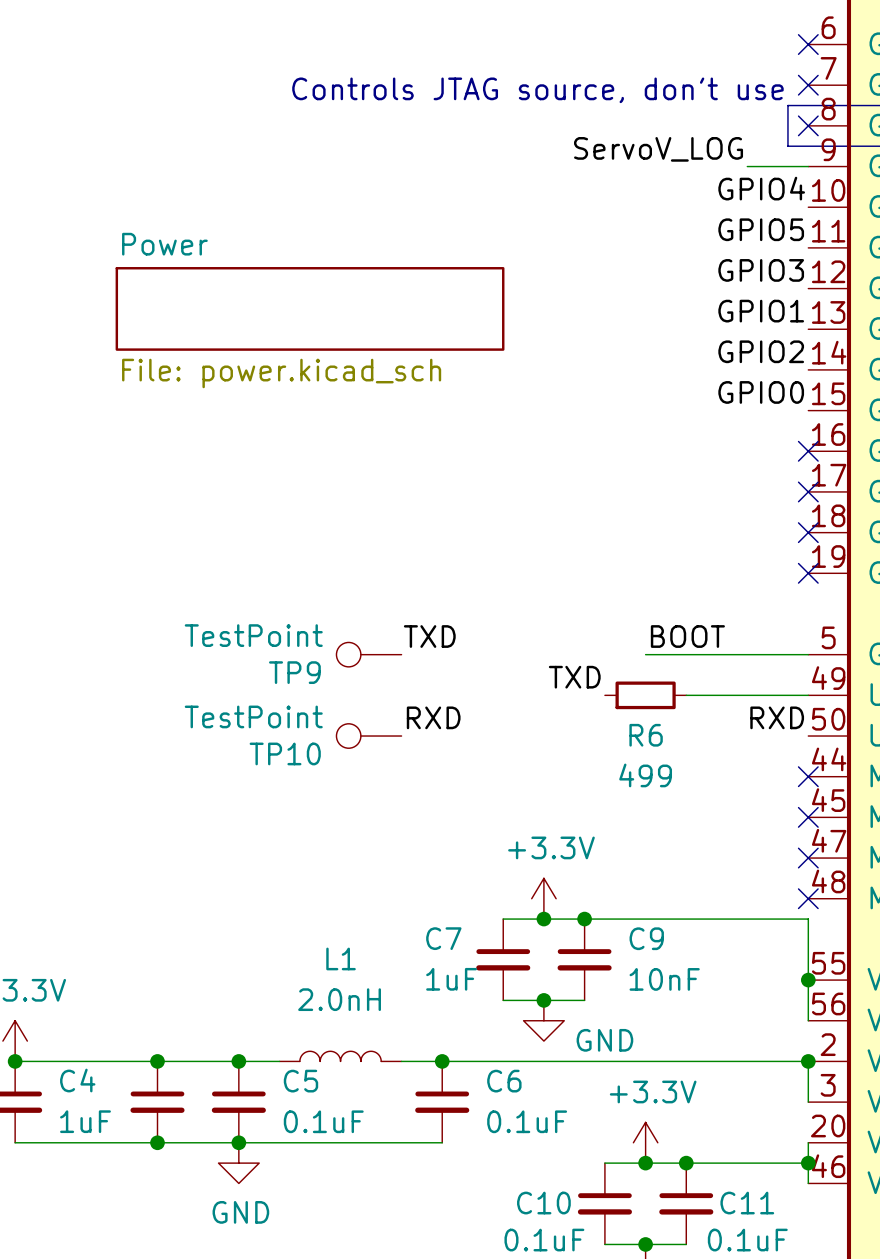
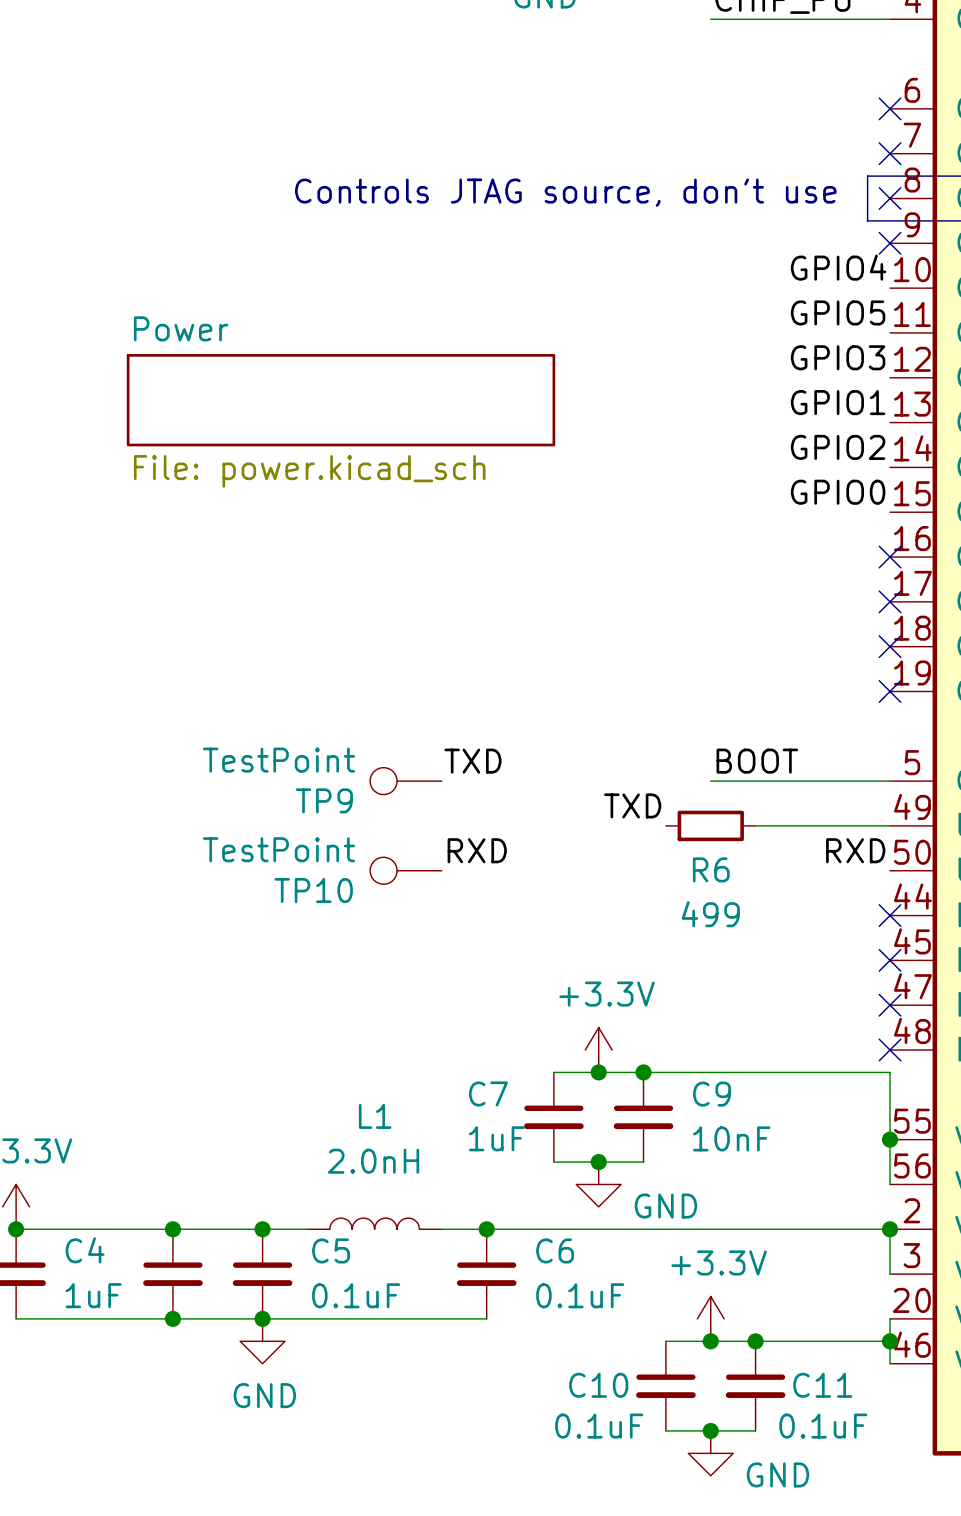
text position: Controls JTAG source, don't use (537, 90) -> Controls JTAG source, don't use (565, 192)
label: ServoV_LOG (658, 149) -> none
wire: (747, 166) (808, 166) -> none
no-connect mark: none -> (890, 243)

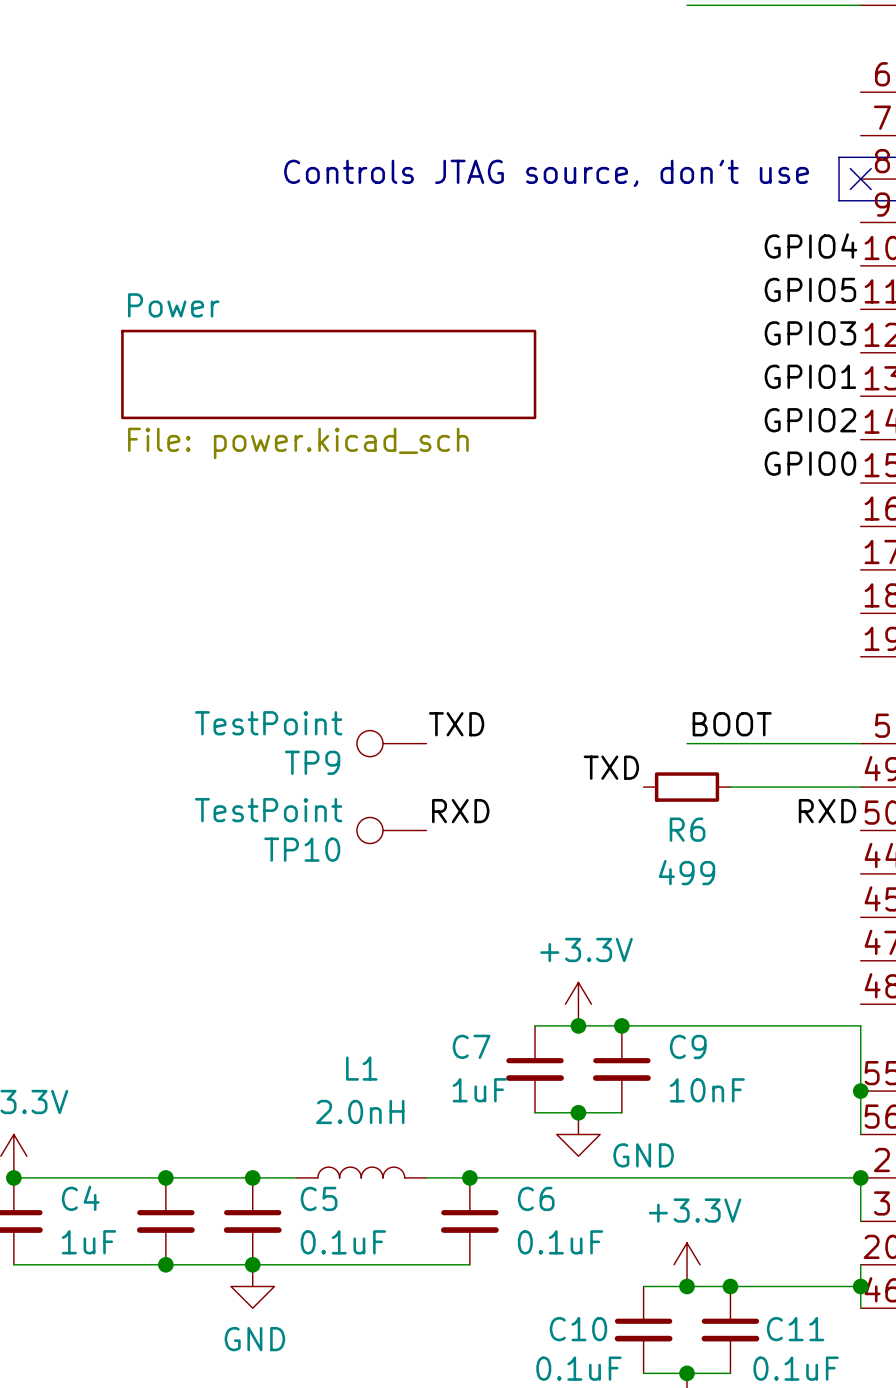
no-connect mark: (890, 108) -> none
no-connect mark: (890, 153) -> none
no-connect mark: (890, 243) -> none
no-connect mark: (890, 557) -> none
no-connect mark: (890, 601) -> none
no-connect mark: (890, 646) -> none
no-connect mark: (890, 691) -> none
no-connect mark: (890, 915) -> none
no-connect mark: (890, 960) -> none
no-connect mark: (890, 1005) -> none
no-connect mark: (890, 1050) -> none

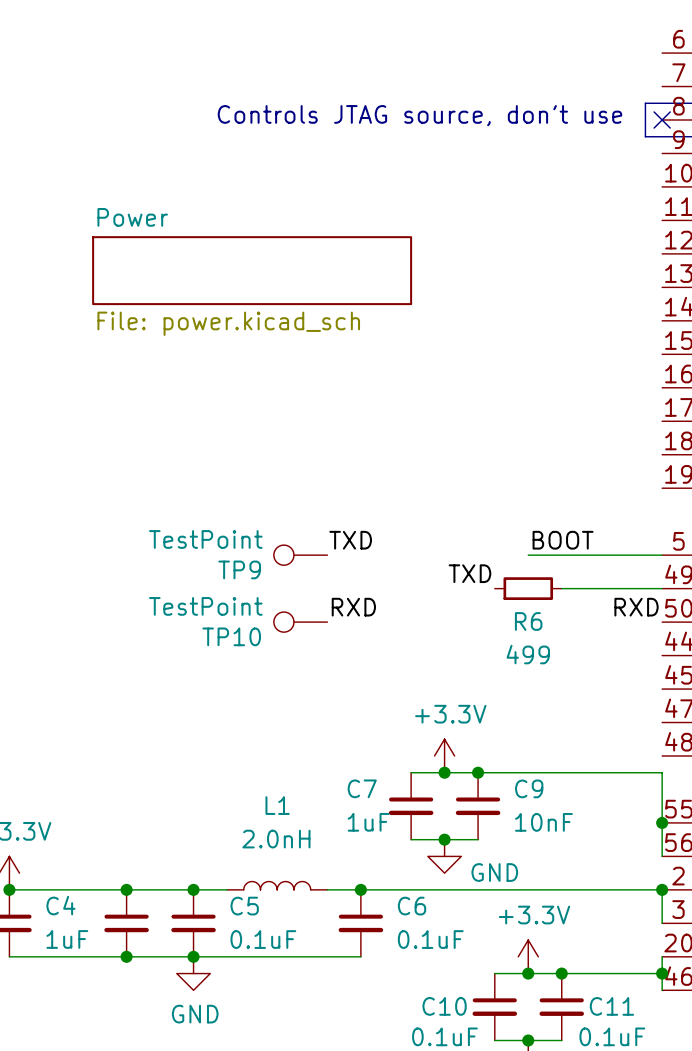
label: GPIO4 (810, 246) -> none
label: GPIO5 (810, 289) -> none
label: GPIO3 (810, 333) -> none
label: GPIO1 (810, 376) -> none
label: GPIO2 (810, 420) -> none
label: GPIO0 (810, 463) -> none

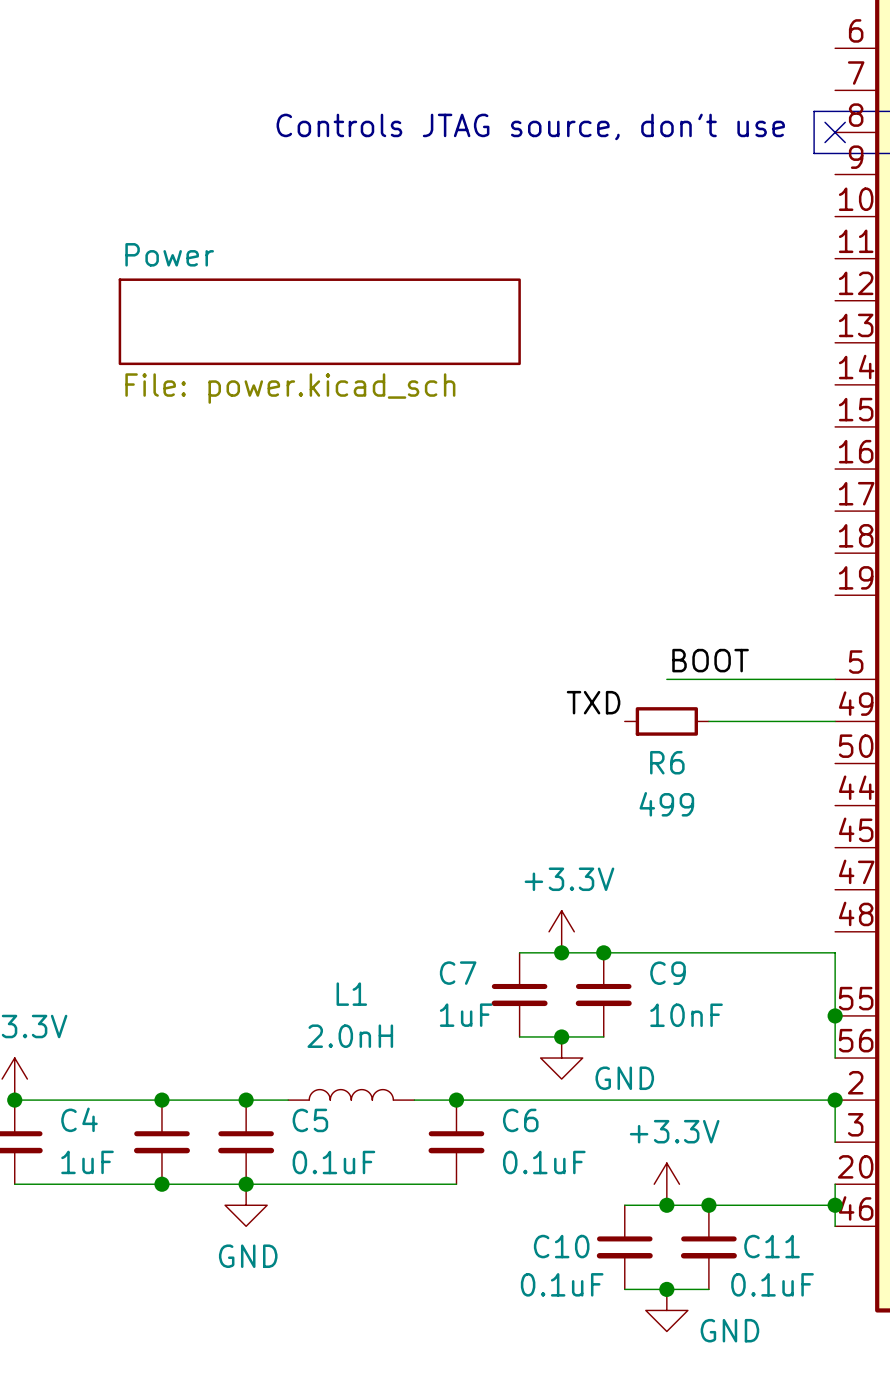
label: TXD (350, 540) -> none
TP9: TestPoint (300, 555) -> none
label: RXD (353, 607) -> none
label: RXD (636, 607) -> none
TP10: TestPoint (300, 622) -> none

